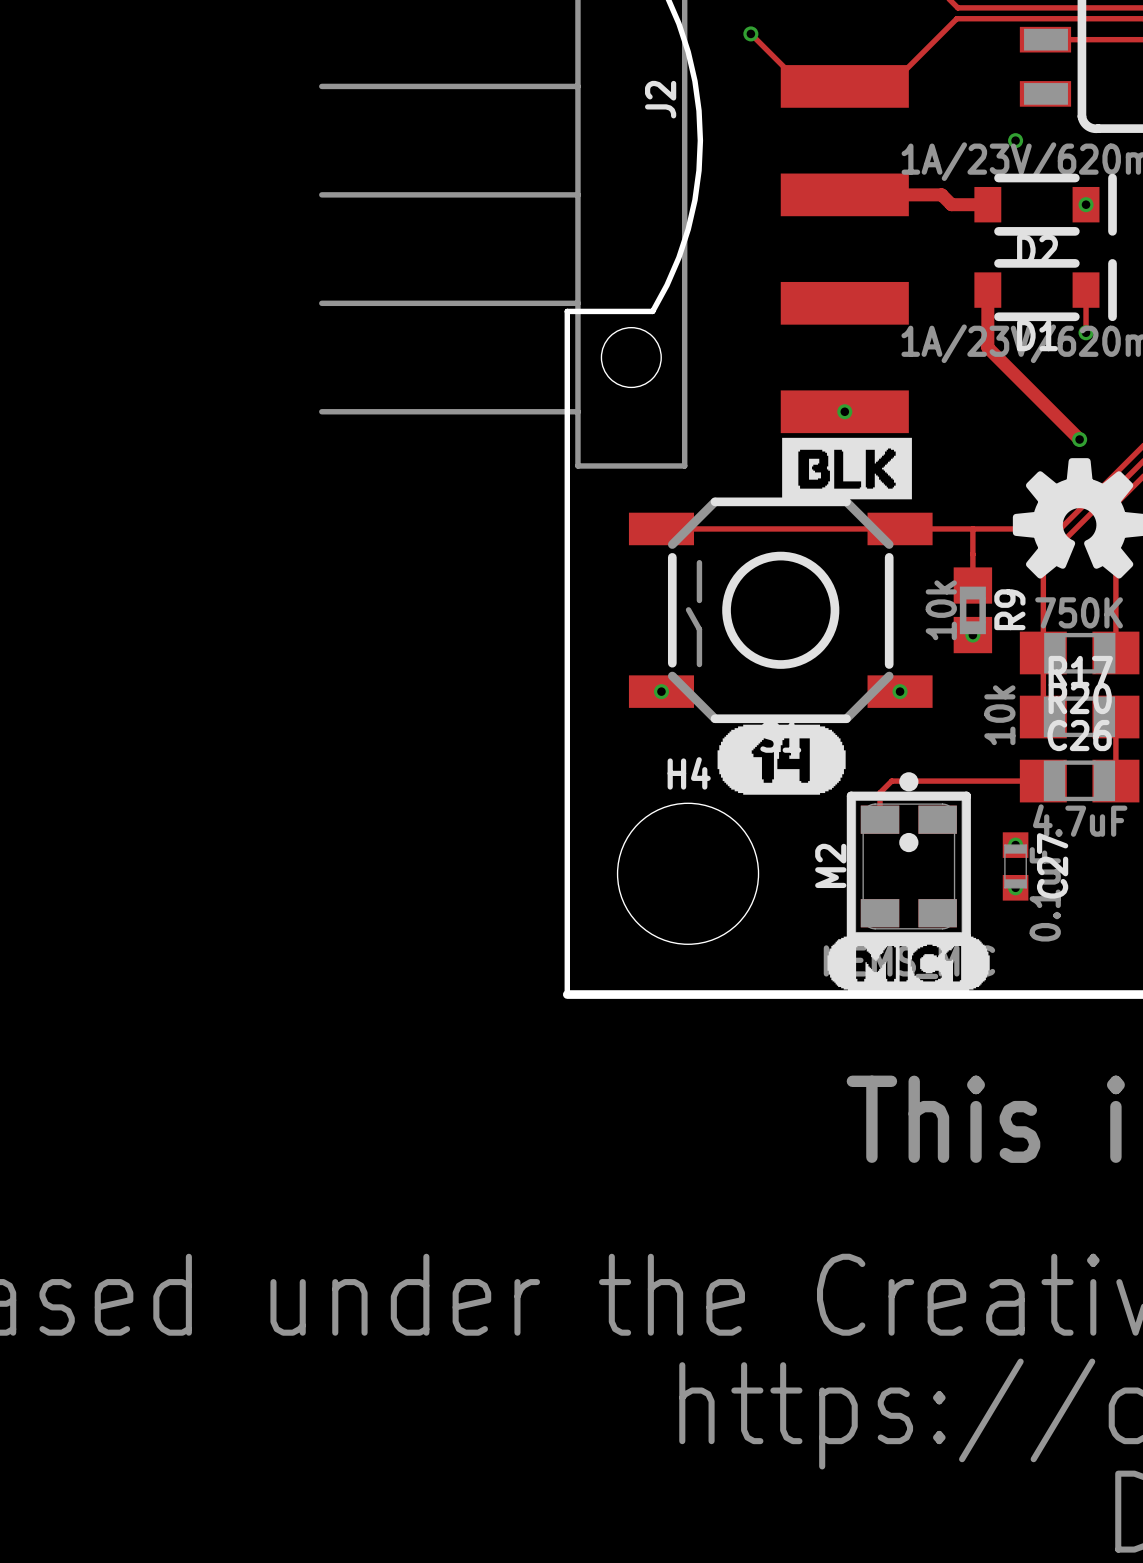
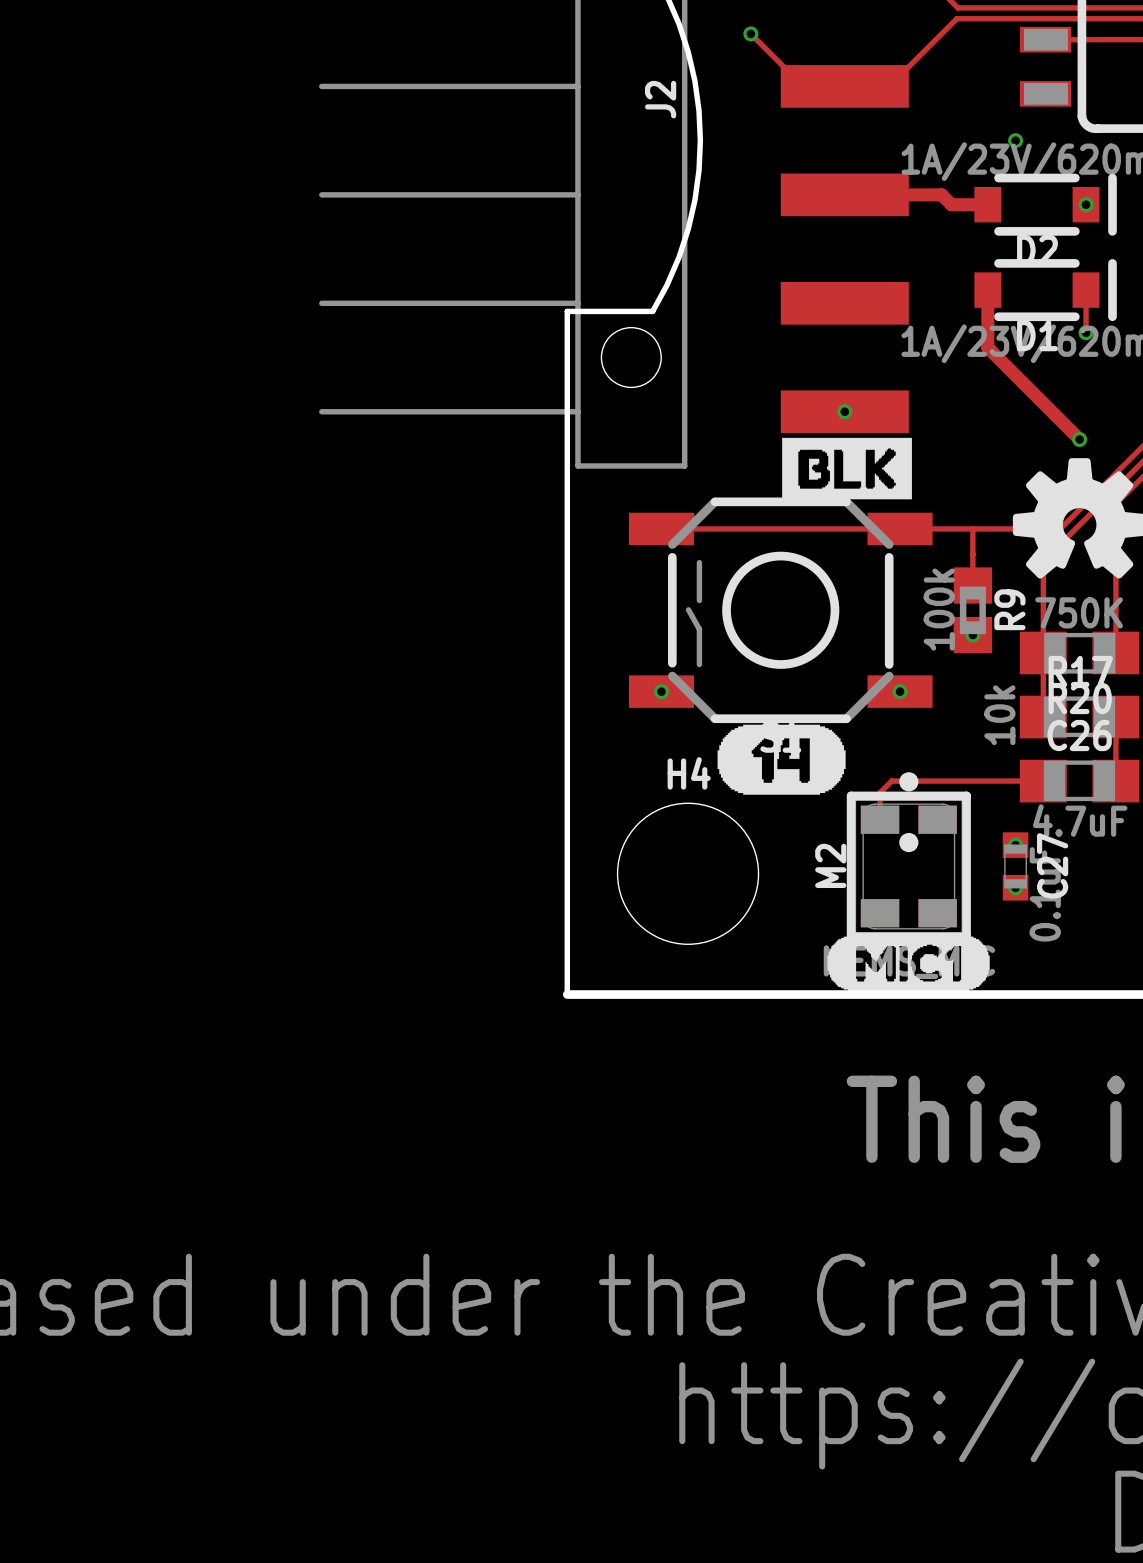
R9 value: 10k (941, 610) -> 100k (939, 609)

